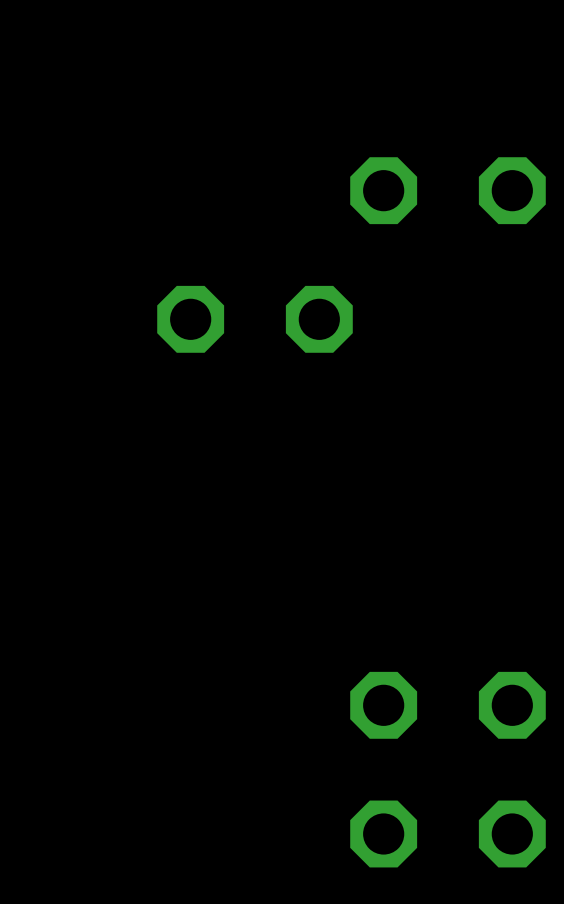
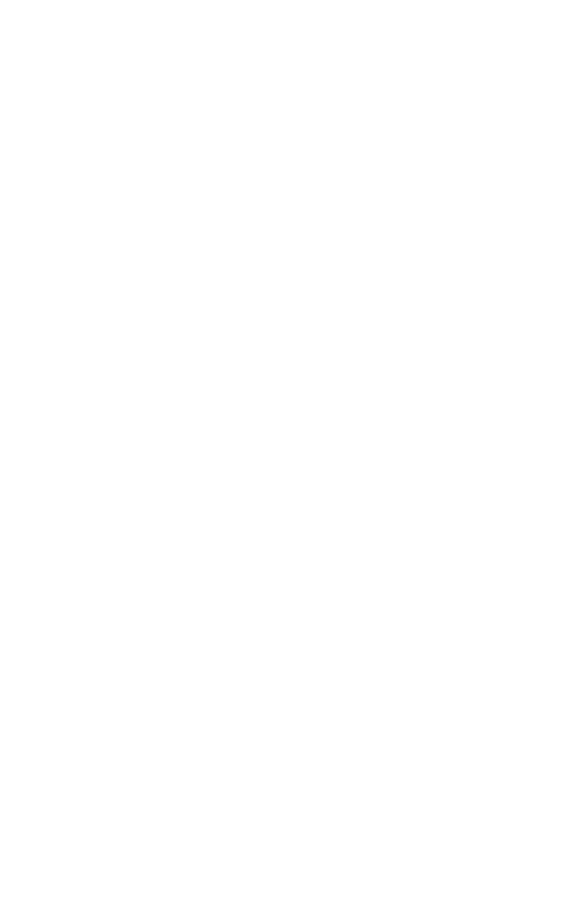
part: (447, 190) -> none
part: (255, 319) -> none
part: (447, 705) -> none
part: (447, 833) -> none

